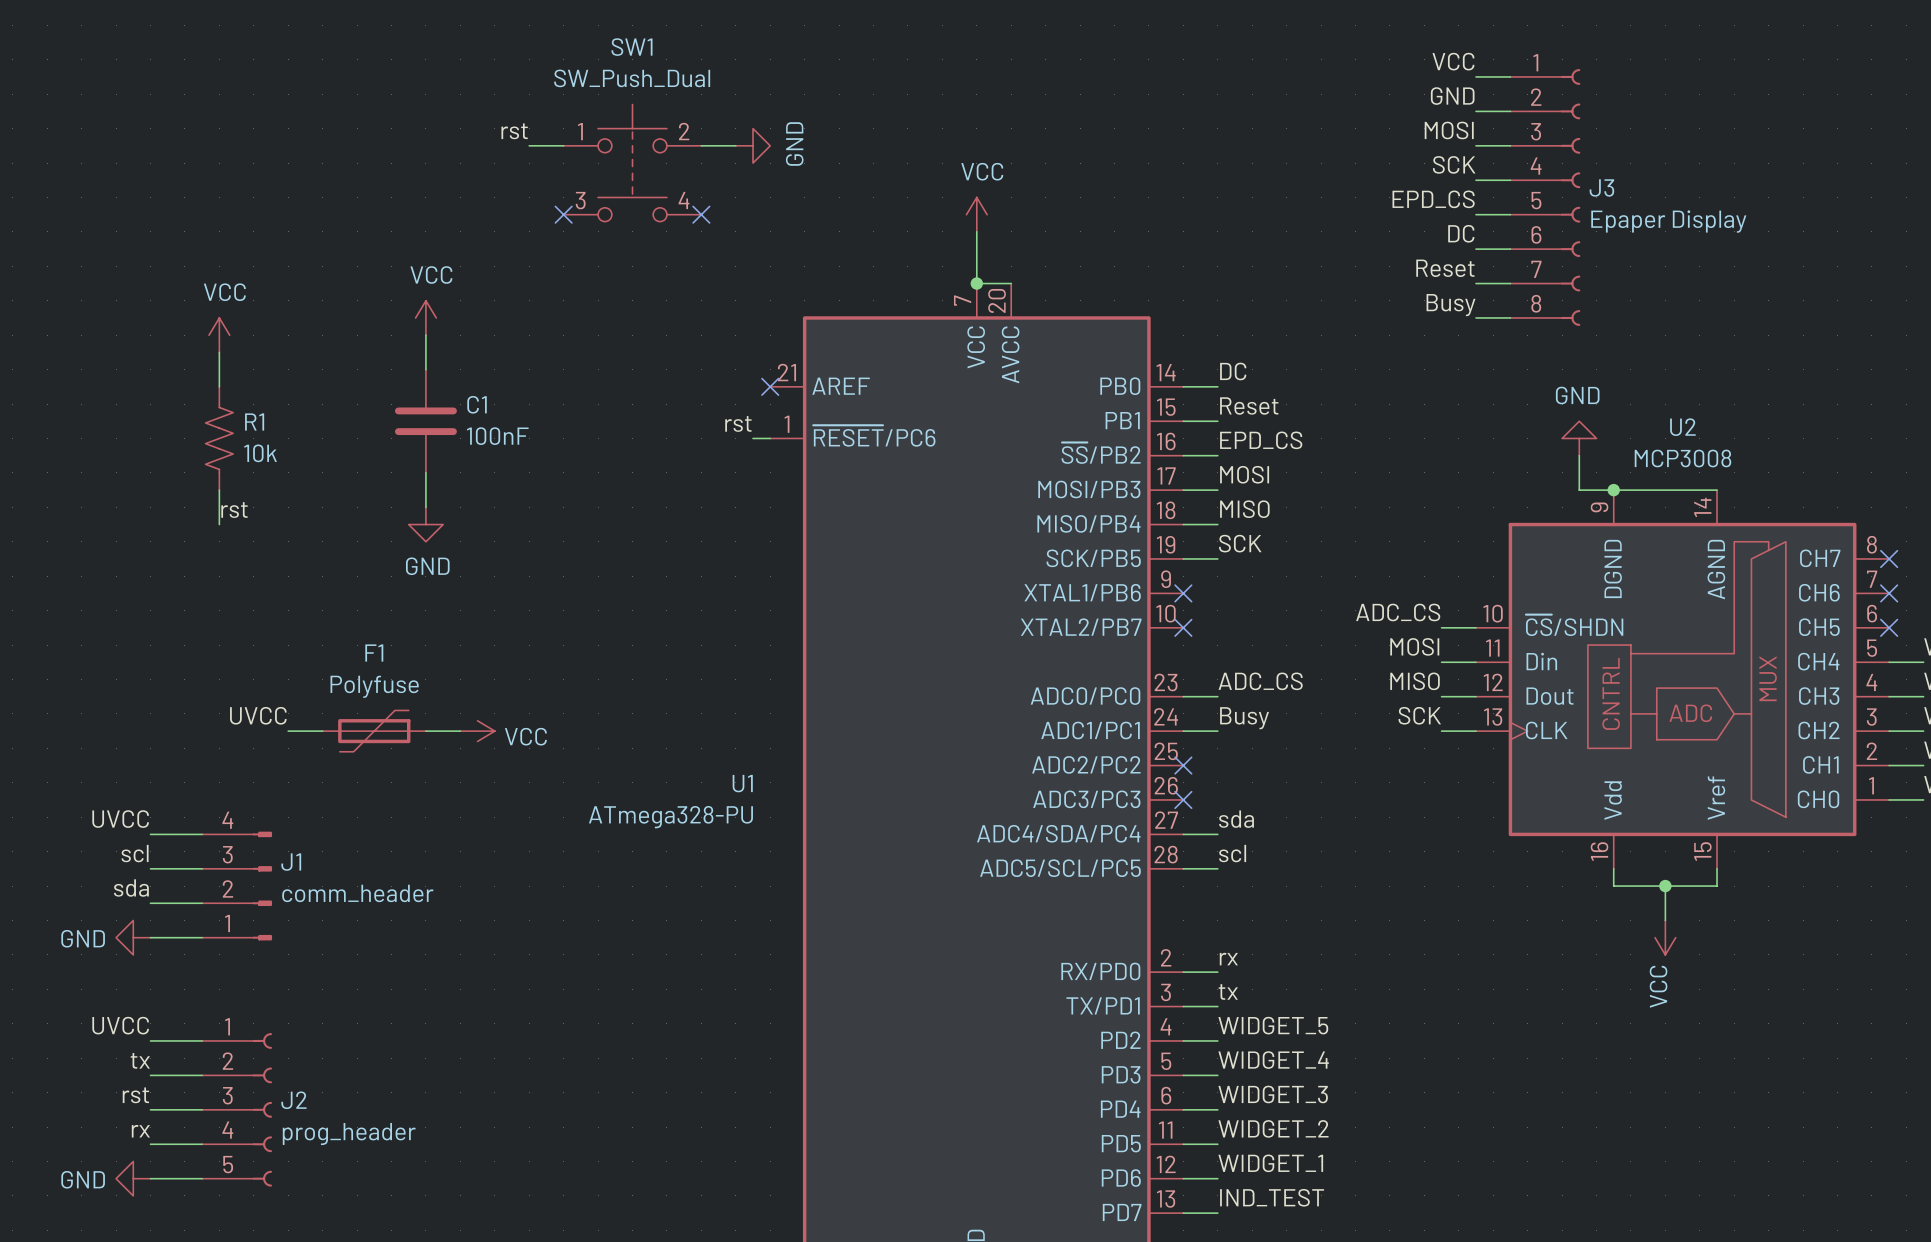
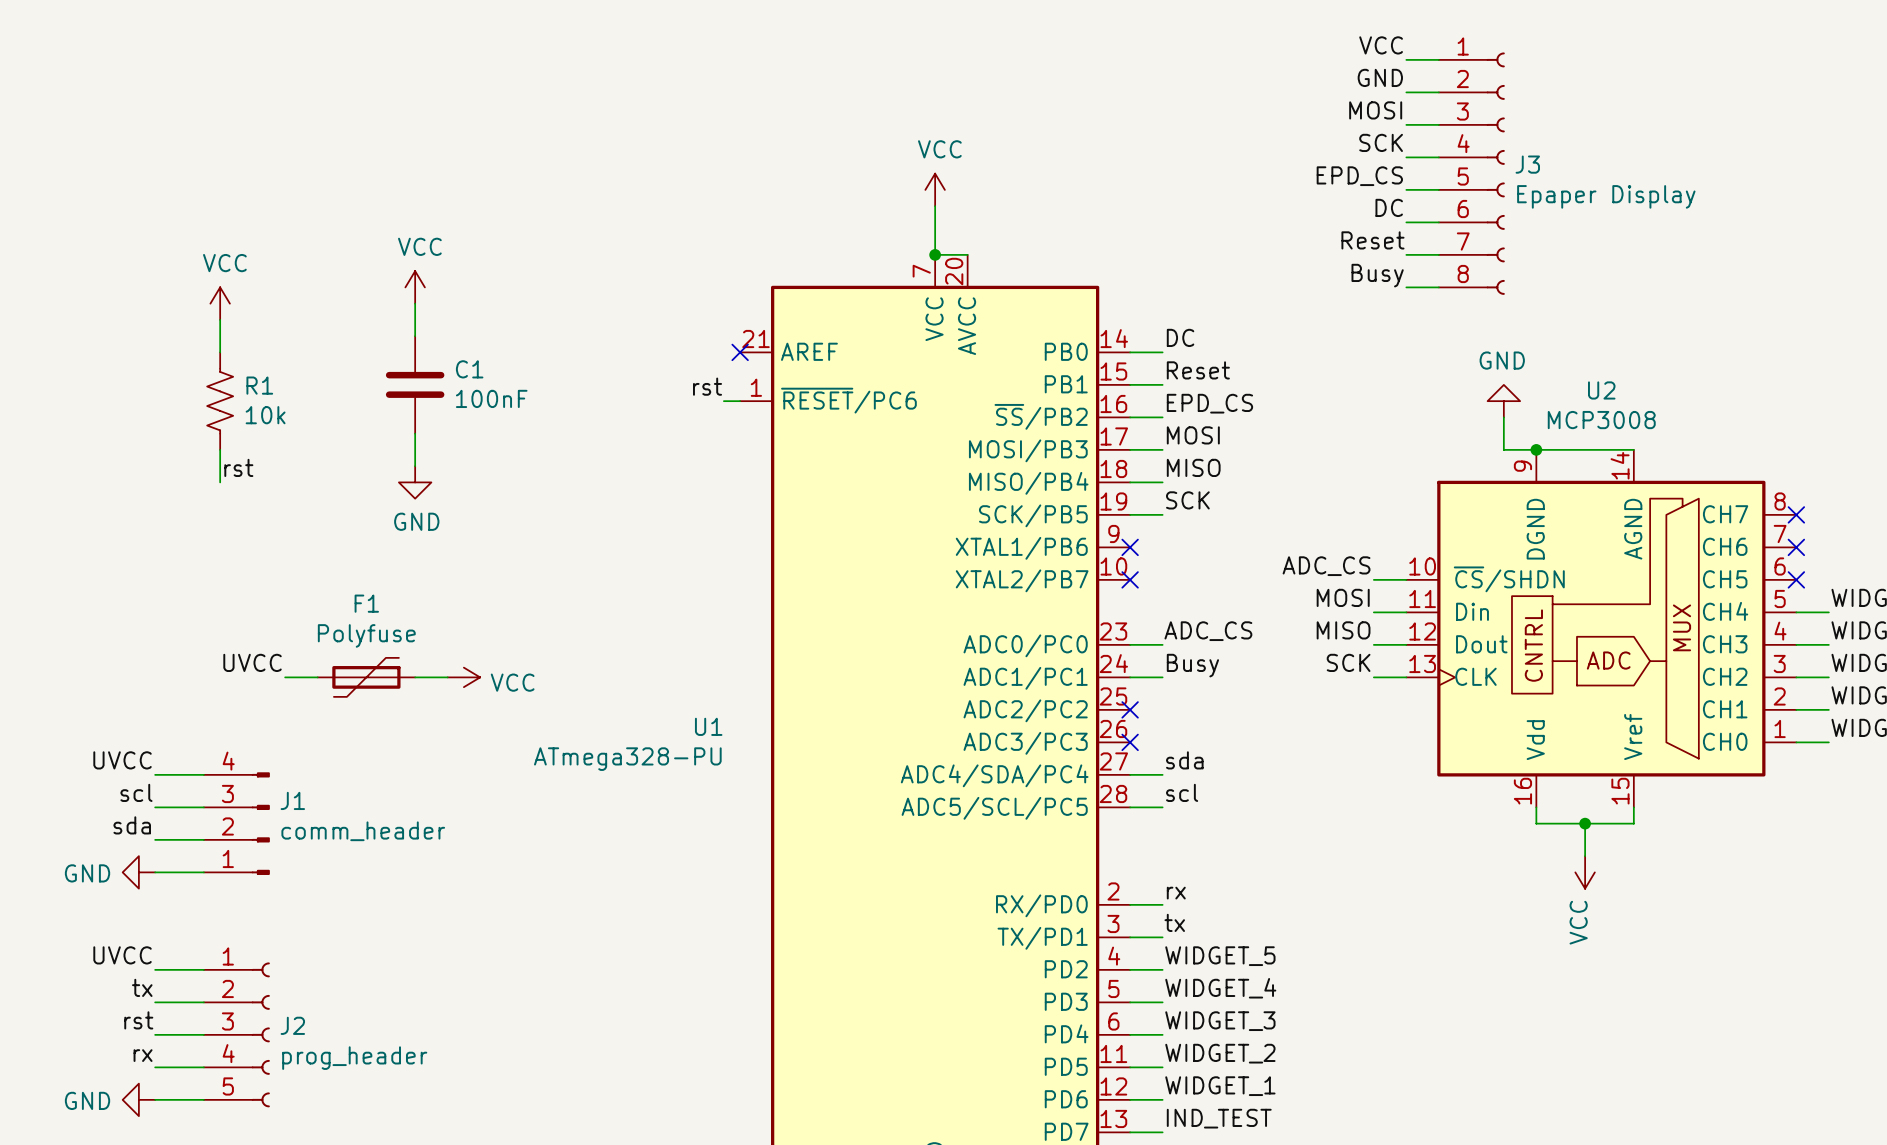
label: rst (514, 131) -> none
wire: (529, 145) (563, 145) -> none
wire: (701, 145) (735, 145) -> none
power symbol: GND (753, 145) -> none
SW1: SW_Push_Dual (632, 163) -> none
no-connect mark: (563, 214) -> none
no-connect mark: (701, 214) -> none

